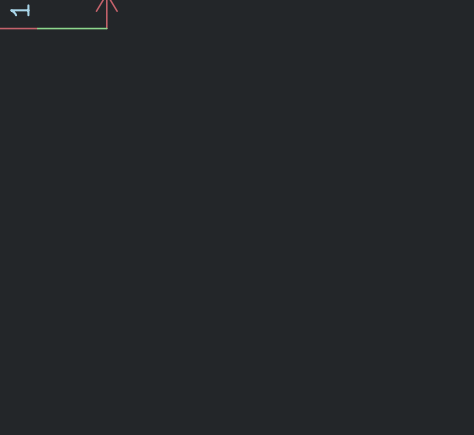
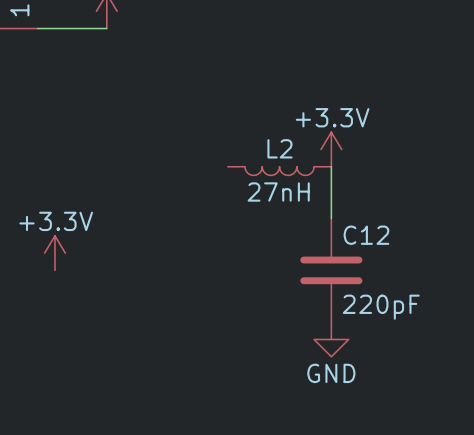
power symbol: none -> +3.3V (331, 149)
wire: none -> (331, 166) (331, 218)
L2: none -> 27nH (279, 171)
power symbol: none -> +3.3V (54, 253)
C12: none -> 220pF (331, 270)
power symbol: none -> GND (331, 339)

